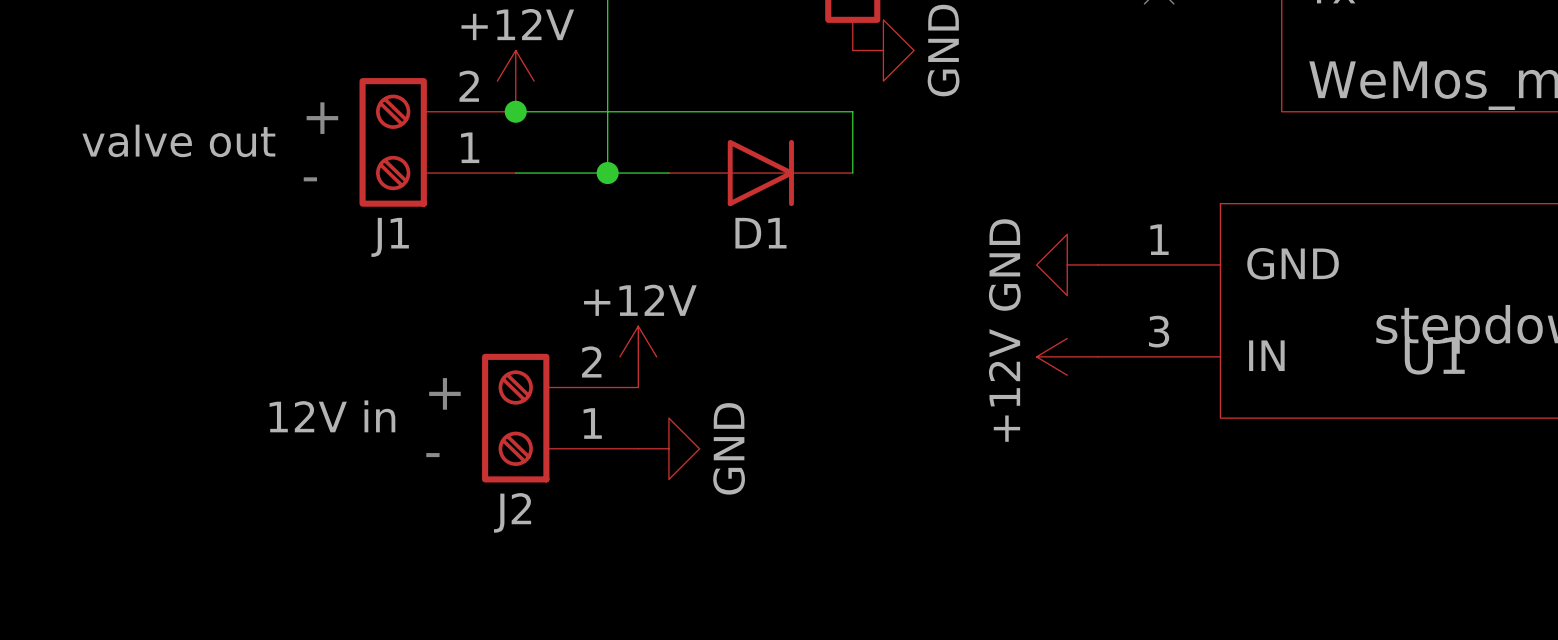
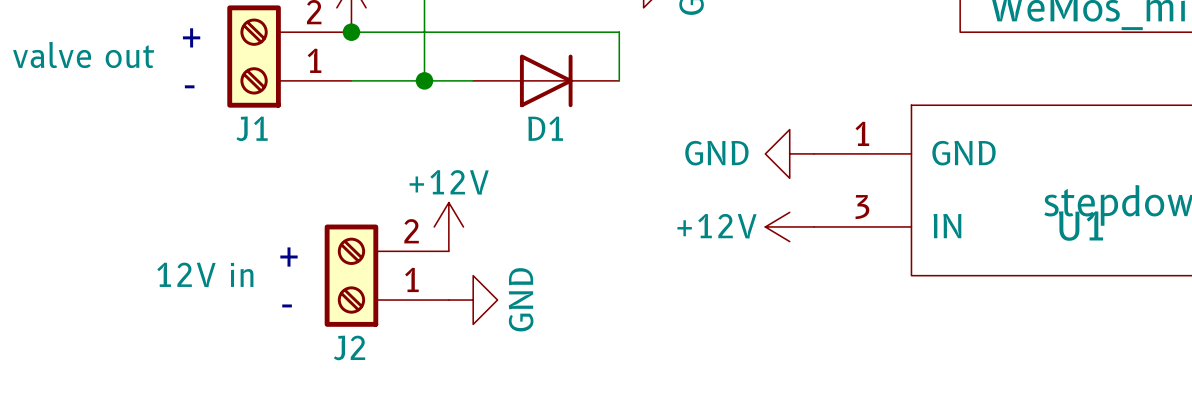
power symbol text rotation: 0° (1004, 265) -> 90° clockwise (716, 153)
power symbol text rotation: 0° (1004, 385) -> 90° clockwise (717, 226)

